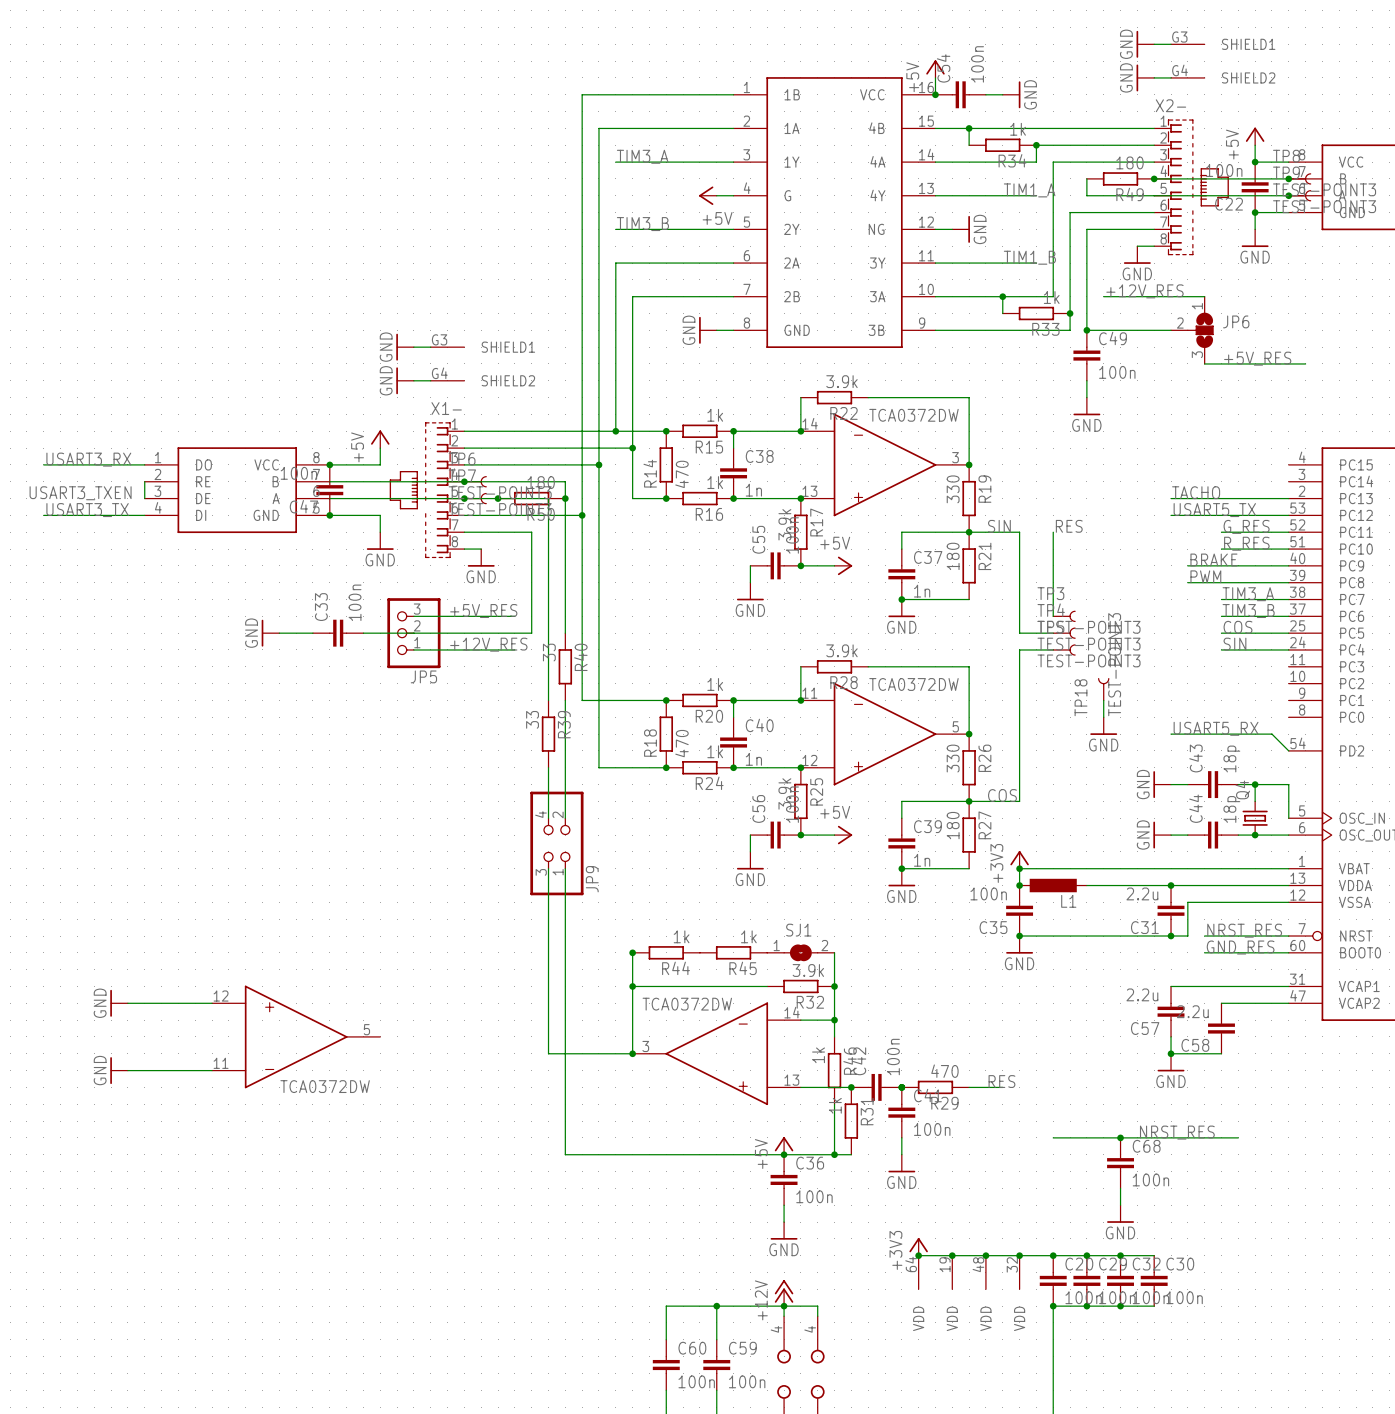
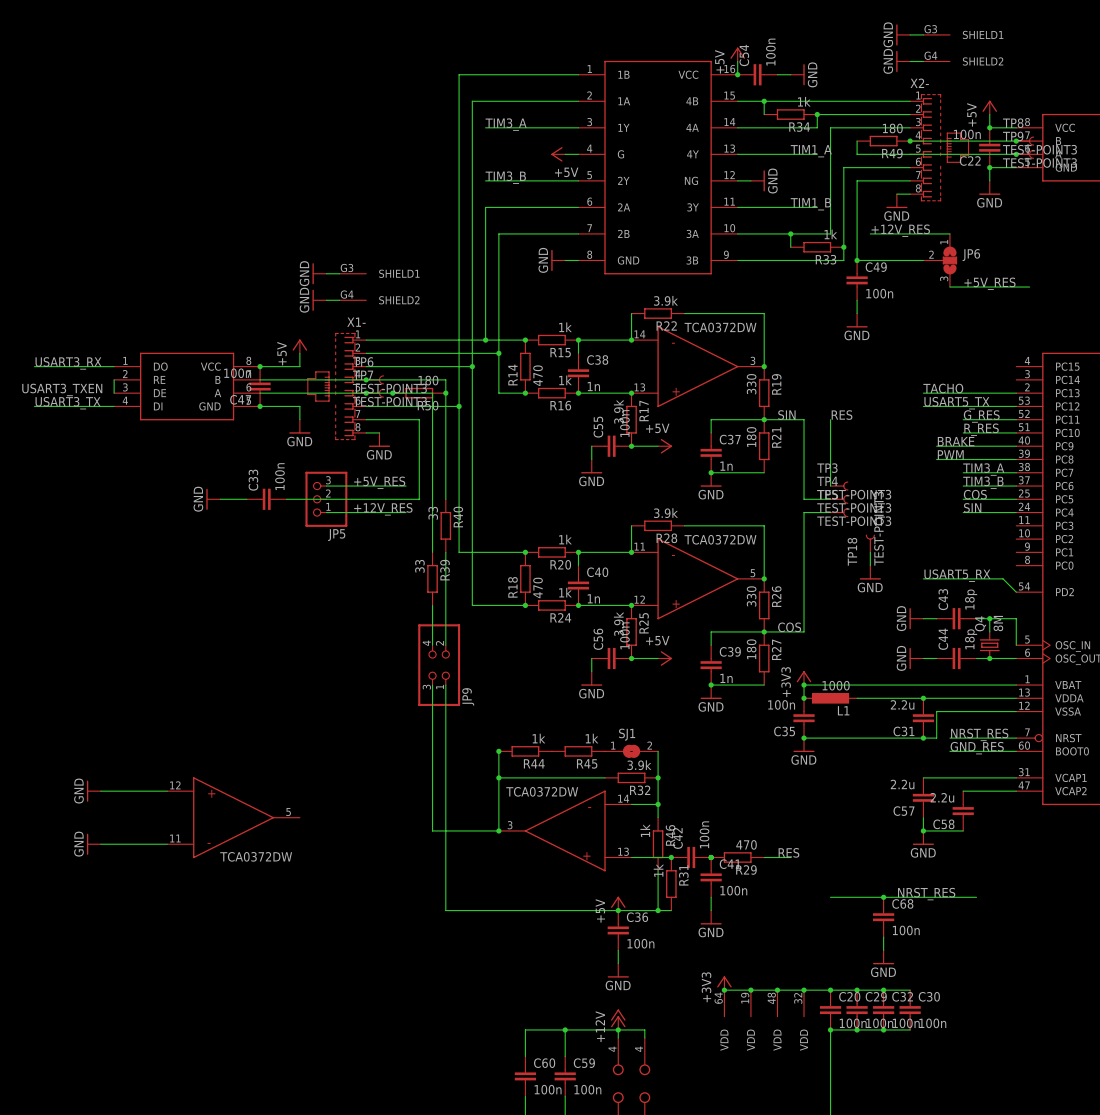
Q4 value: none -> 8M (998, 623)
L1 value: none -> 1000 (836, 685)

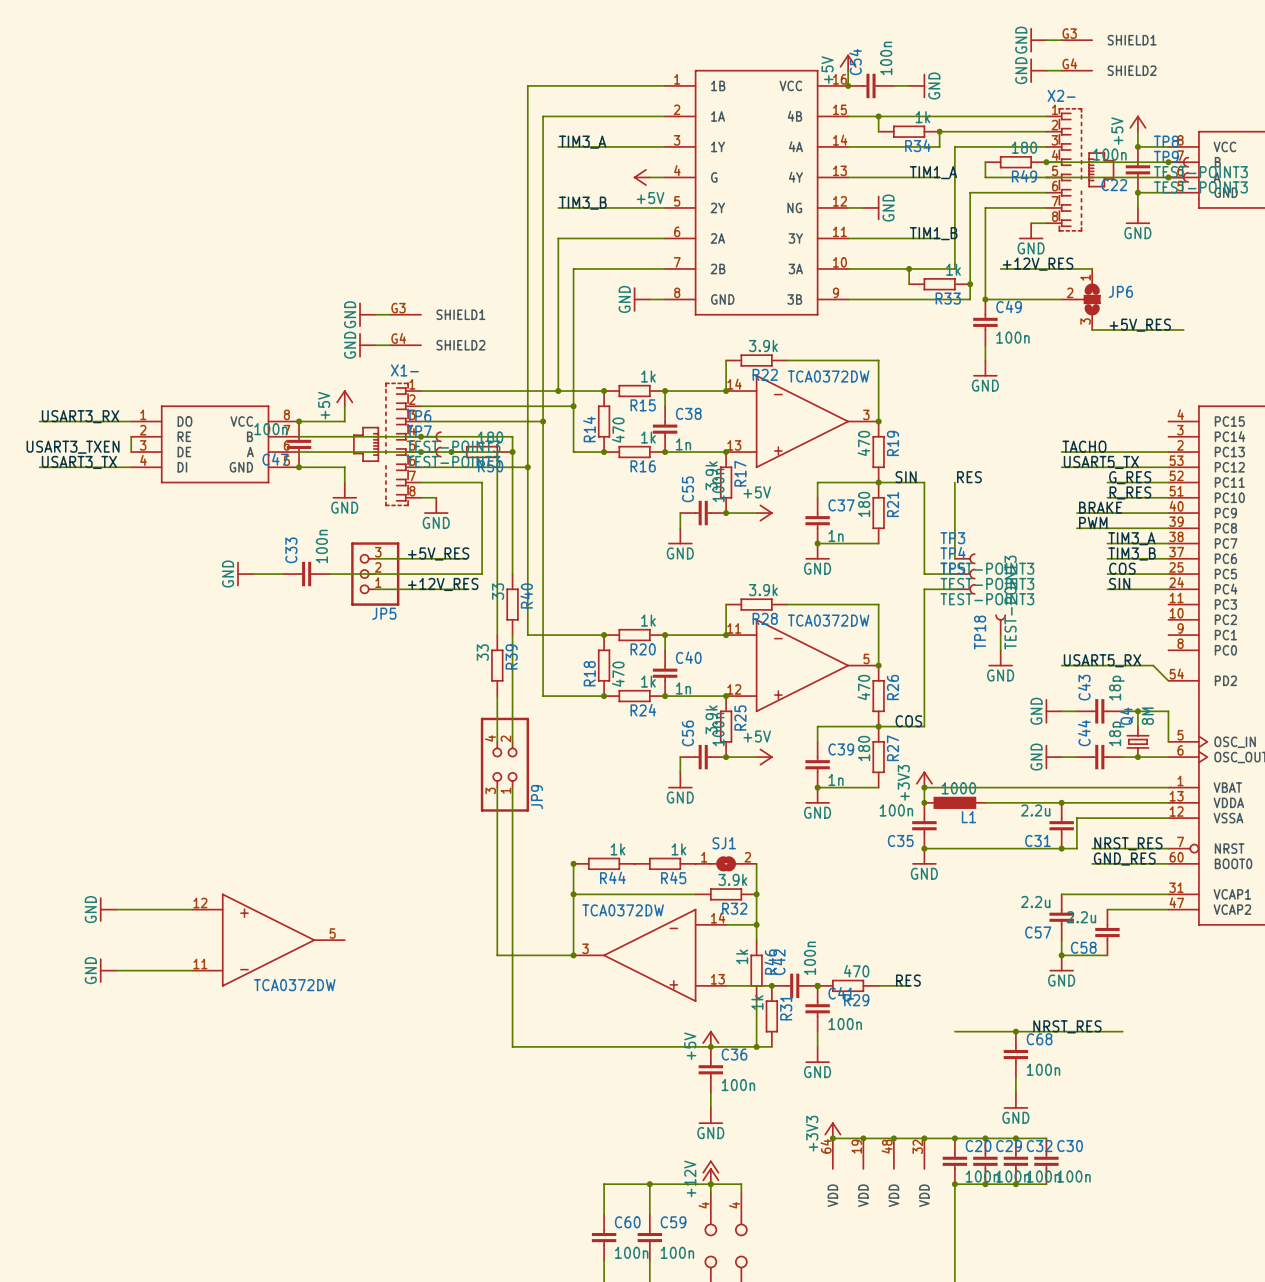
R19 value: 330 (751, 384) -> 470 (863, 443)
R26 value: 330 (751, 596) -> 470 (863, 687)

